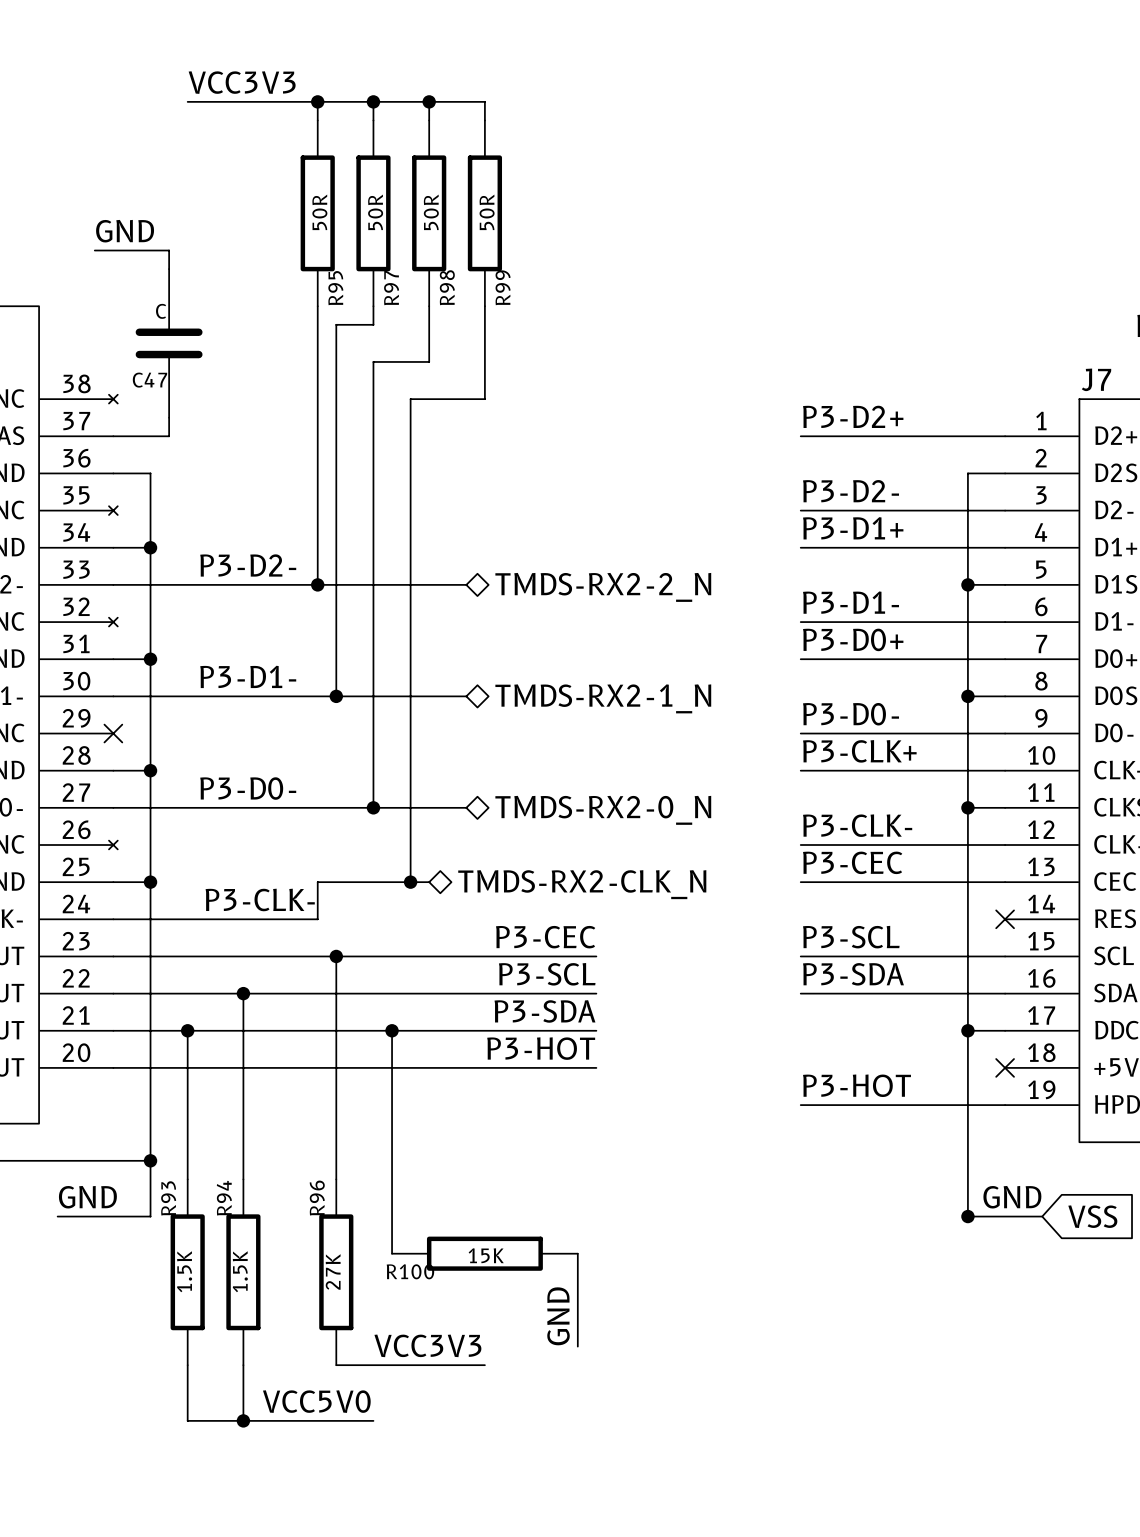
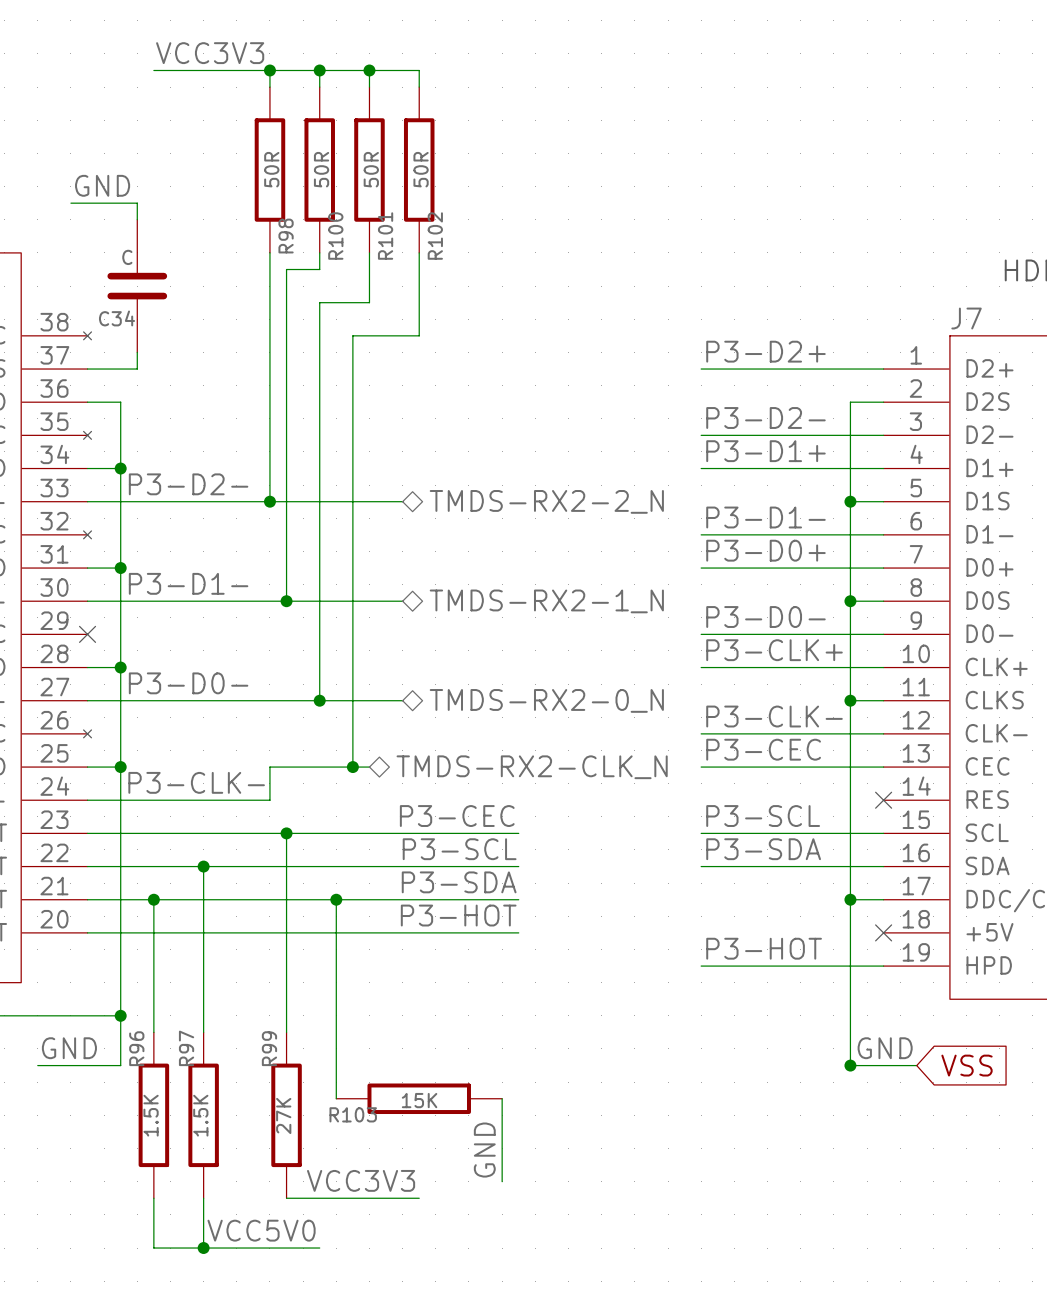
R97 name: R97 (391, 287) -> R100 (335, 236)
R98 name: R98 (447, 287) -> R101 (385, 236)
R99 name: R99 (503, 287) -> R102 (435, 236)
R95 name: R95 (335, 288) -> R98 (286, 236)
C47 name: C47 (149, 380) -> C34 (117, 318)
R93 name: R93 (168, 1198) -> R96 (136, 1048)
R94 name: R94 (224, 1198) -> R97 (186, 1048)
R96 name: R96 (317, 1198) -> R99 (269, 1048)
R100 name: R100 (410, 1271) -> R103 (353, 1114)

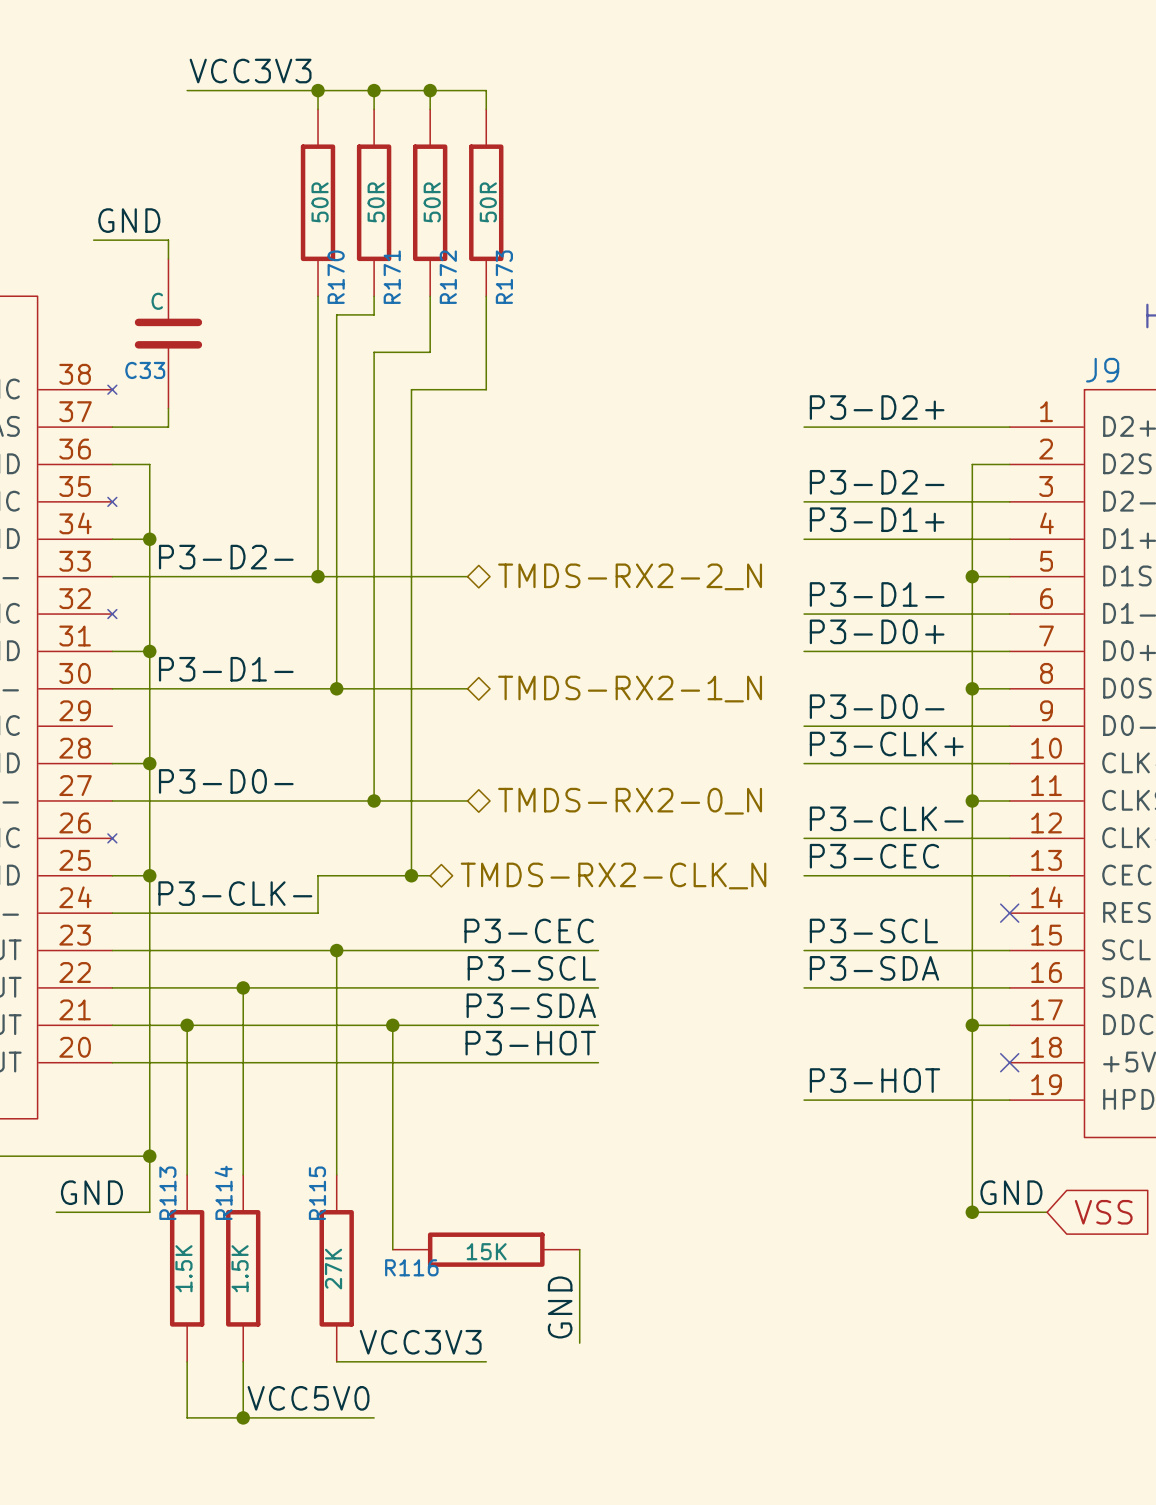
R98 name: R98 (286, 236) -> R170 (336, 277)
R100 name: R100 (335, 236) -> R171 (392, 277)
R101 name: R101 (385, 236) -> R172 (448, 277)
R102 name: R102 (435, 236) -> R173 (504, 277)
C34 name: C34 (117, 318) -> C33 (145, 370)
J7 name: J7 (966, 318) -> J9 (1102, 370)
no-connect mark: (87, 634) -> none
R96 name: R96 (136, 1048) -> R113 (167, 1193)
R97 name: R97 (186, 1048) -> R114 (223, 1192)
R99 name: R99 (269, 1048) -> R115 (317, 1193)
R103 name: R103 (353, 1114) -> R116 (411, 1267)

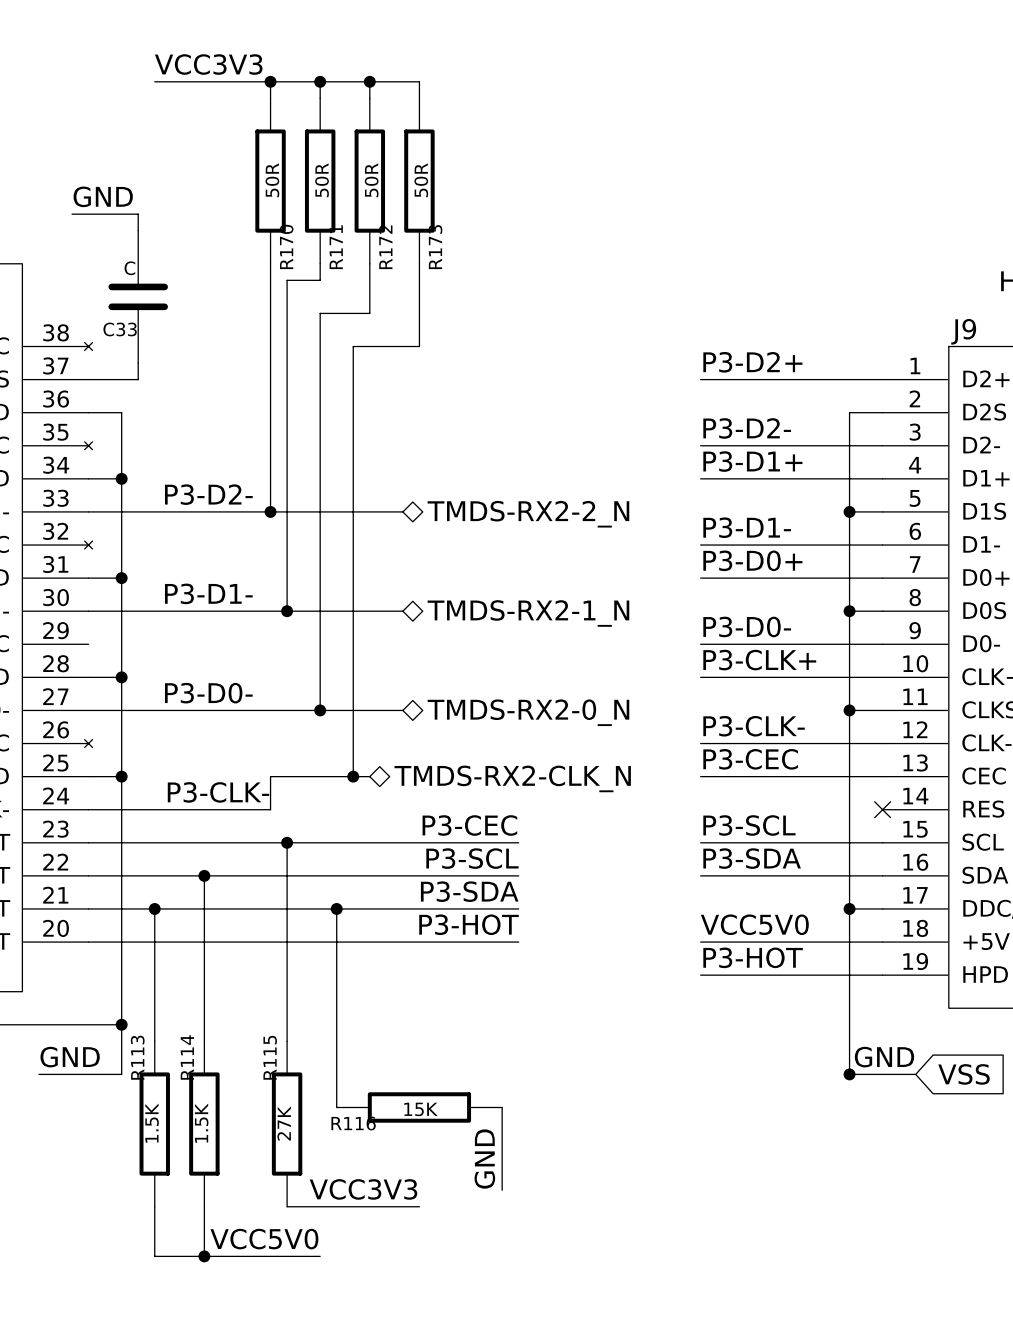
label: none -> VCC5V0 (754, 924)
wire: none -> (700, 942) (882, 942)
no-connect mark: (1009, 1062) -> none

